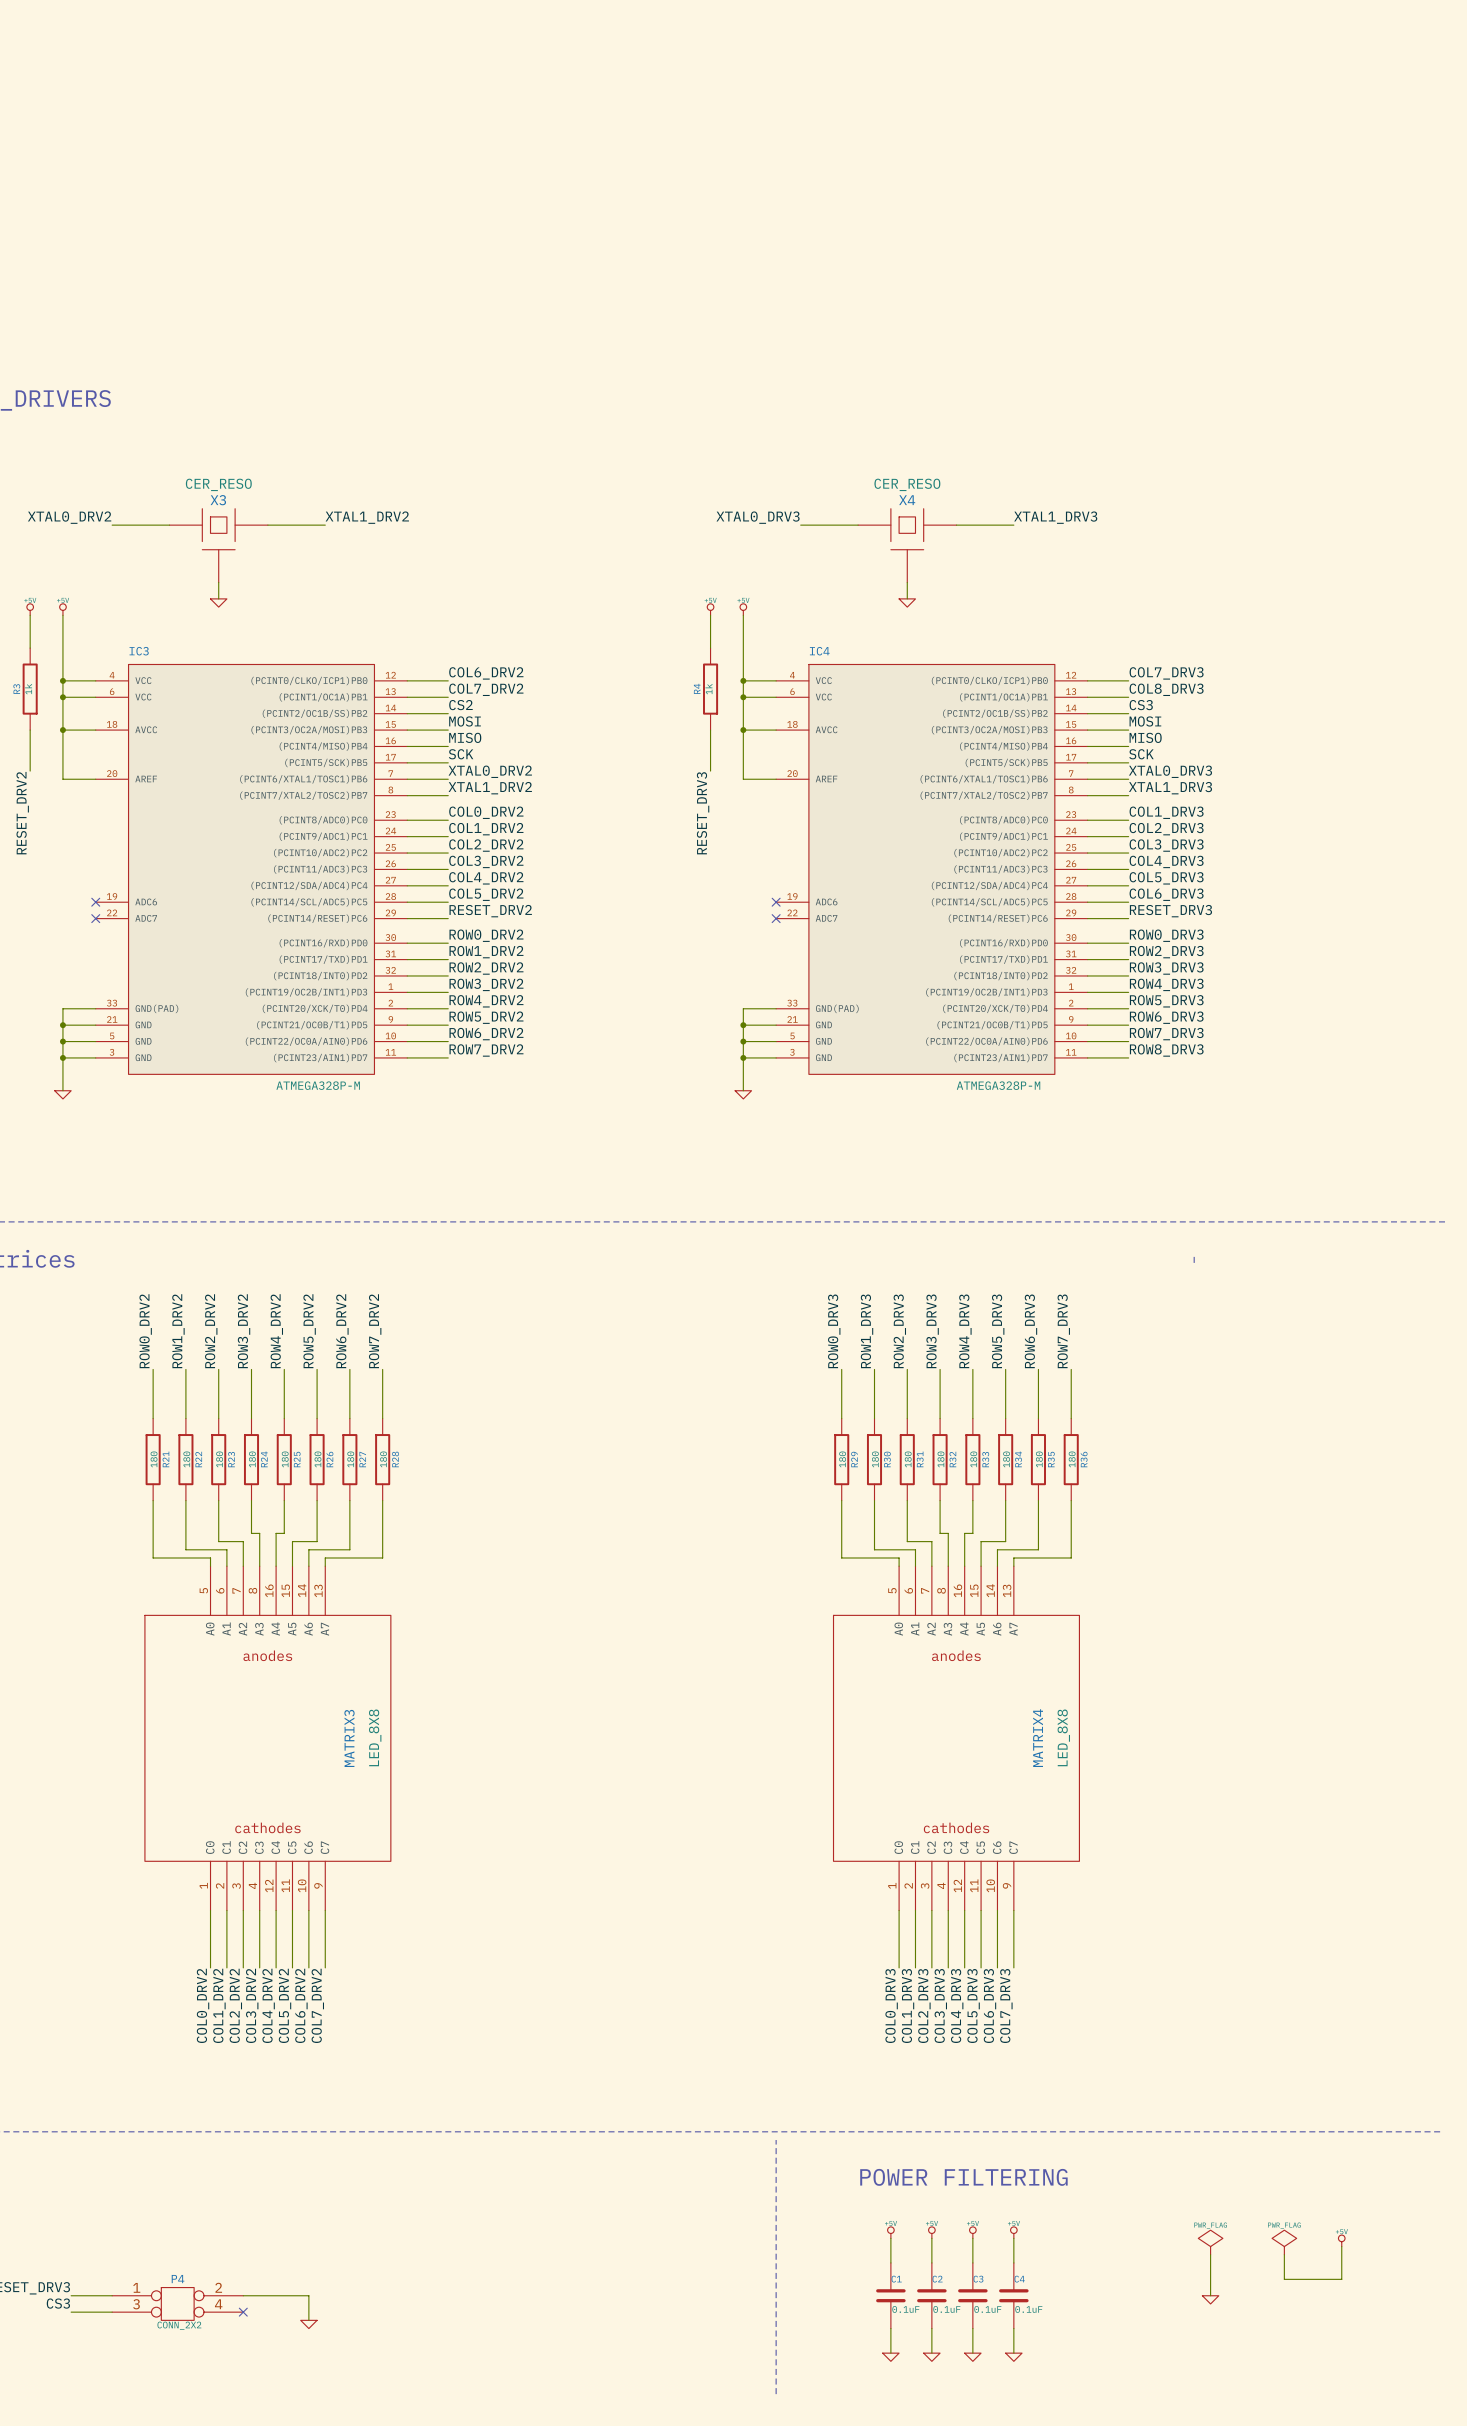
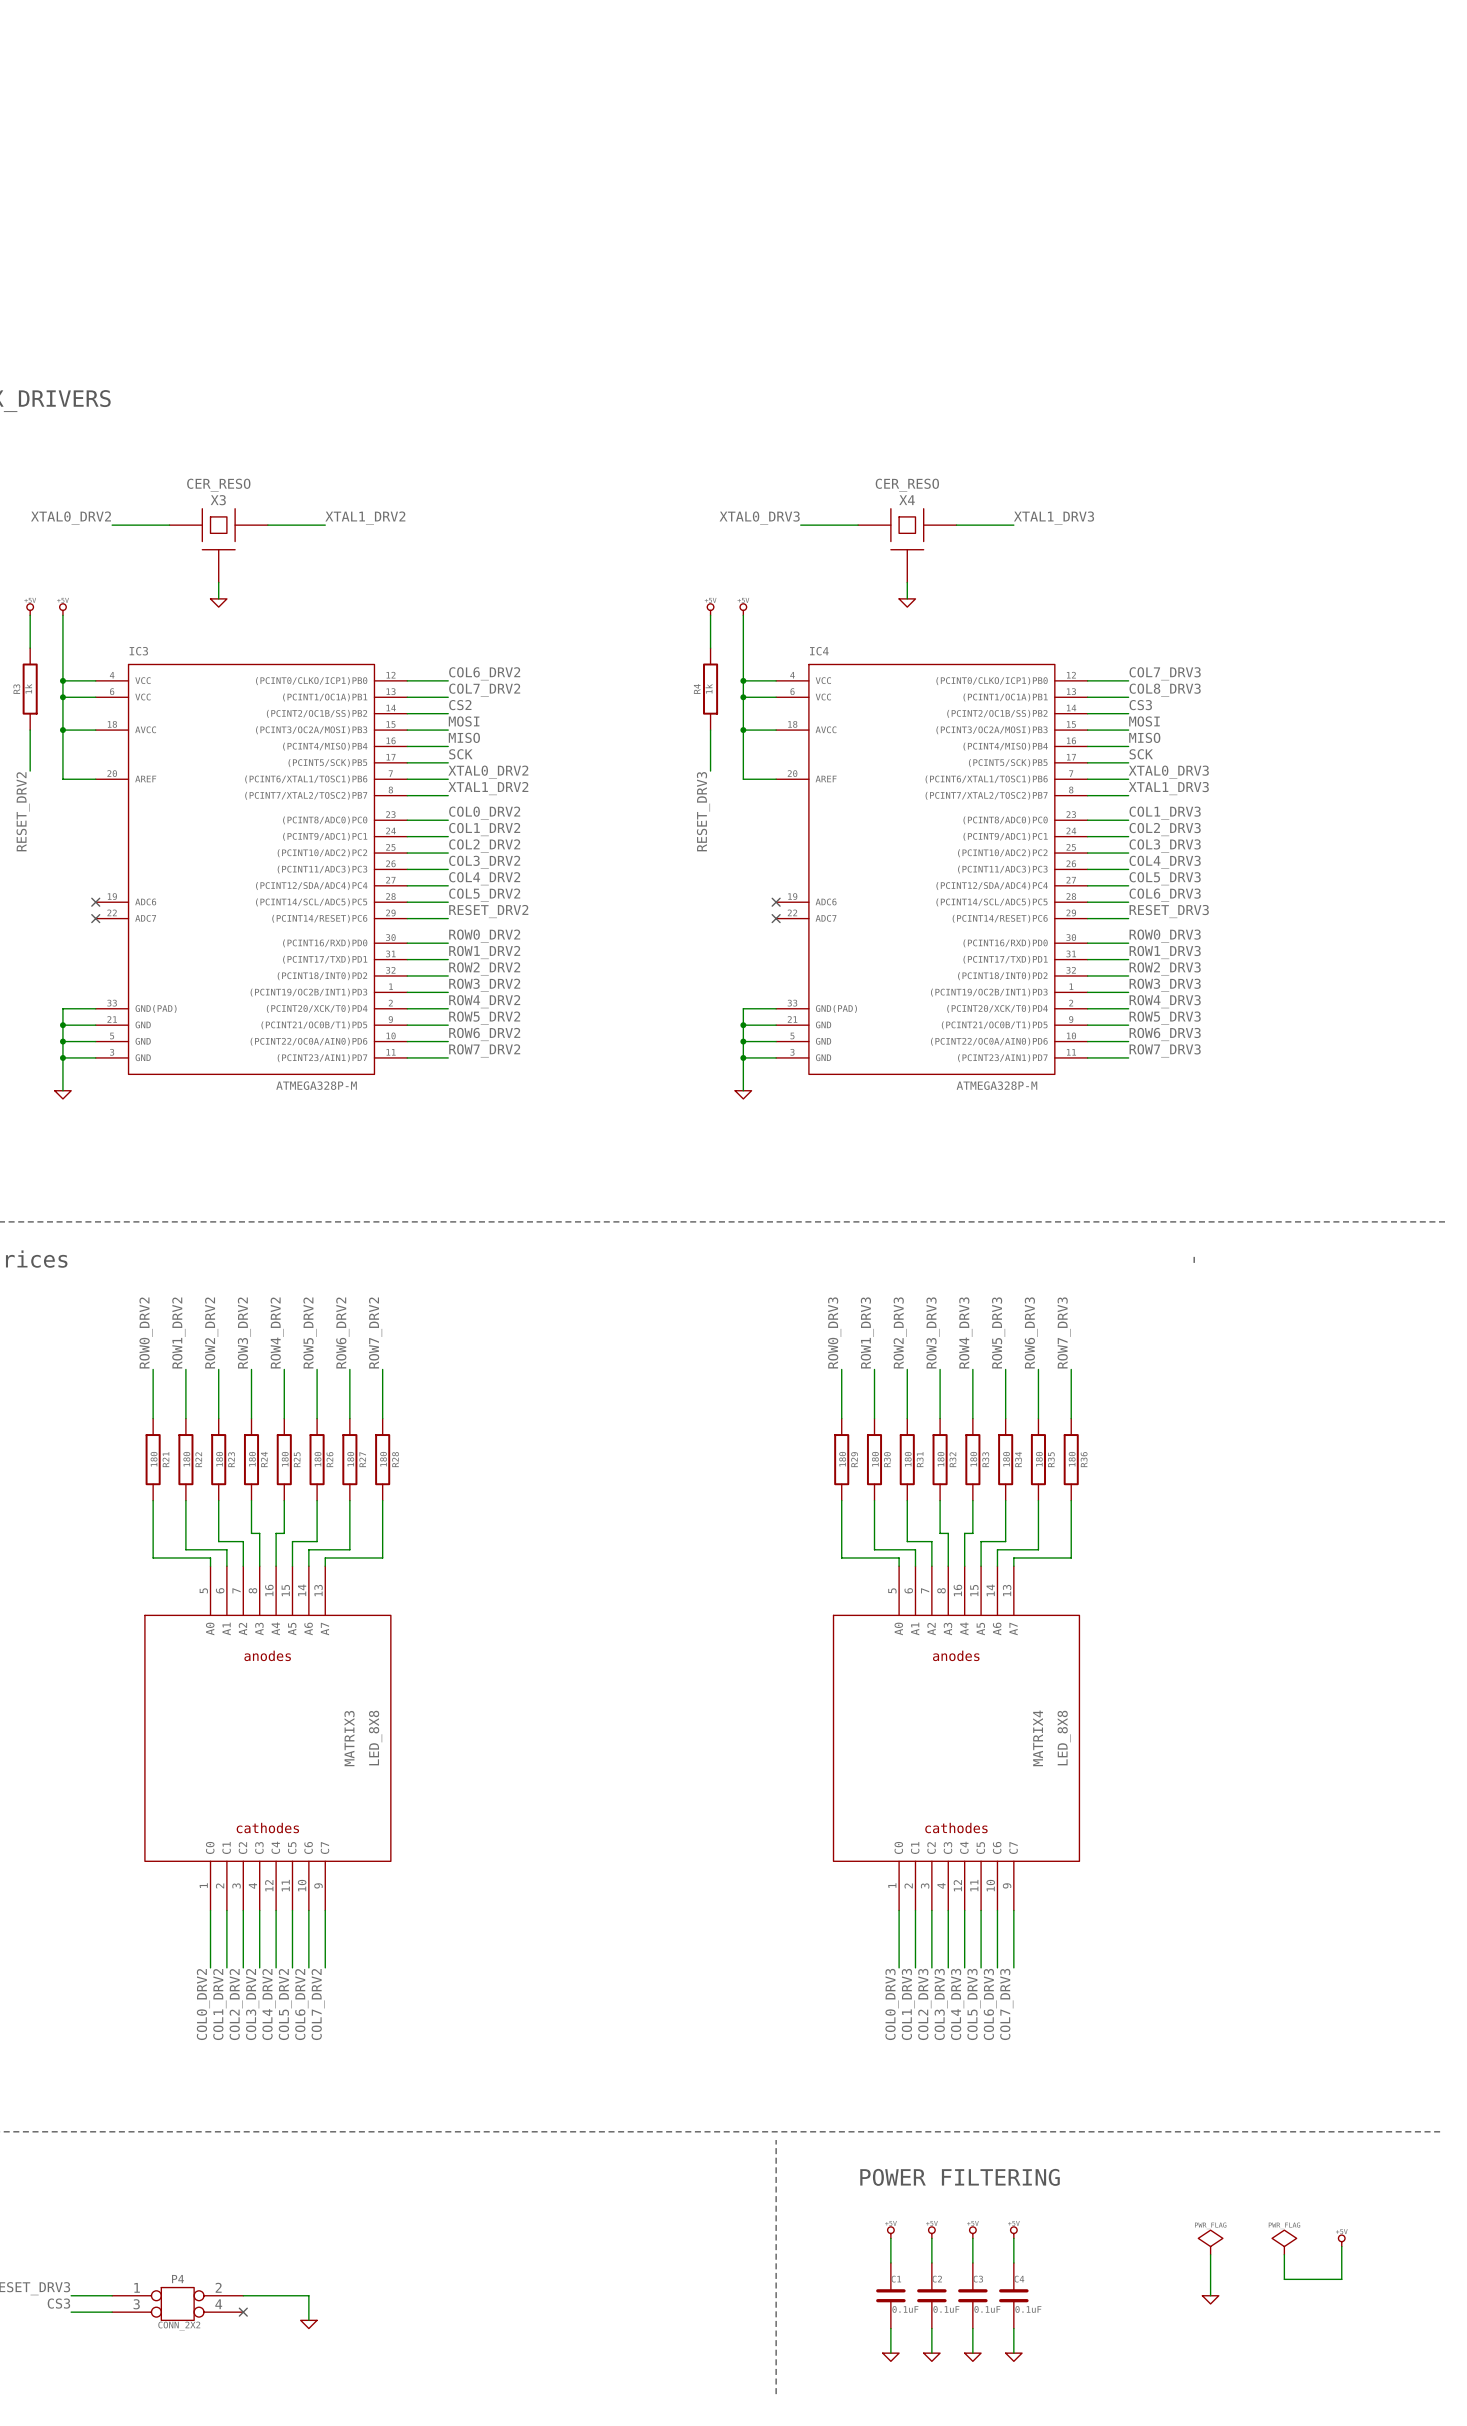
label: ROW2_DRV3 (1166, 952) -> ROW1_DRV3 (1165, 952)
label: ROW3_DRV3 (1166, 968) -> ROW2_DRV3 (1165, 968)
label: ROW4_DRV3 (1166, 984) -> ROW3_DRV3 (1165, 985)
label: ROW5_DRV3 (1166, 1001) -> ROW4_DRV3 (1165, 1001)
label: ROW6_DRV3 (1166, 1017) -> ROW5_DRV3 (1165, 1018)
label: ROW7_DRV3 (1166, 1034) -> ROW6_DRV3 (1165, 1034)
label: ROW8_DRV3 (1166, 1050) -> ROW7_DRV3 (1165, 1050)

